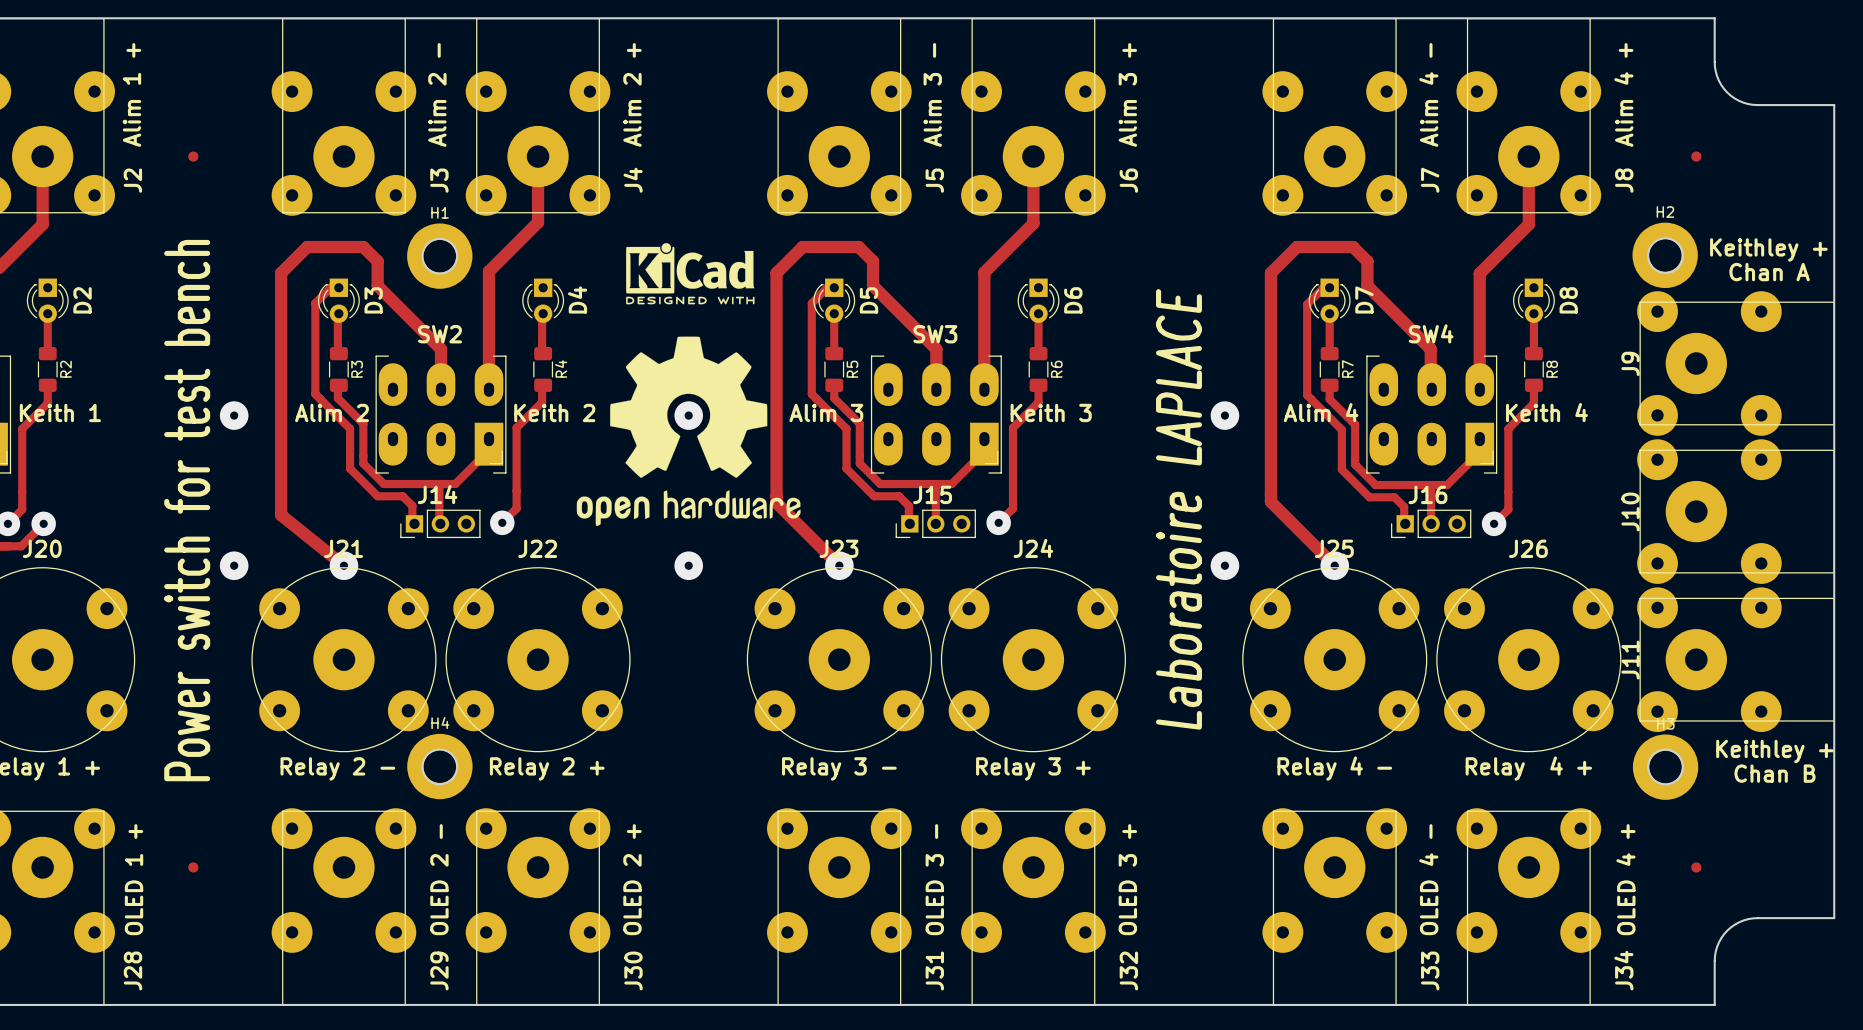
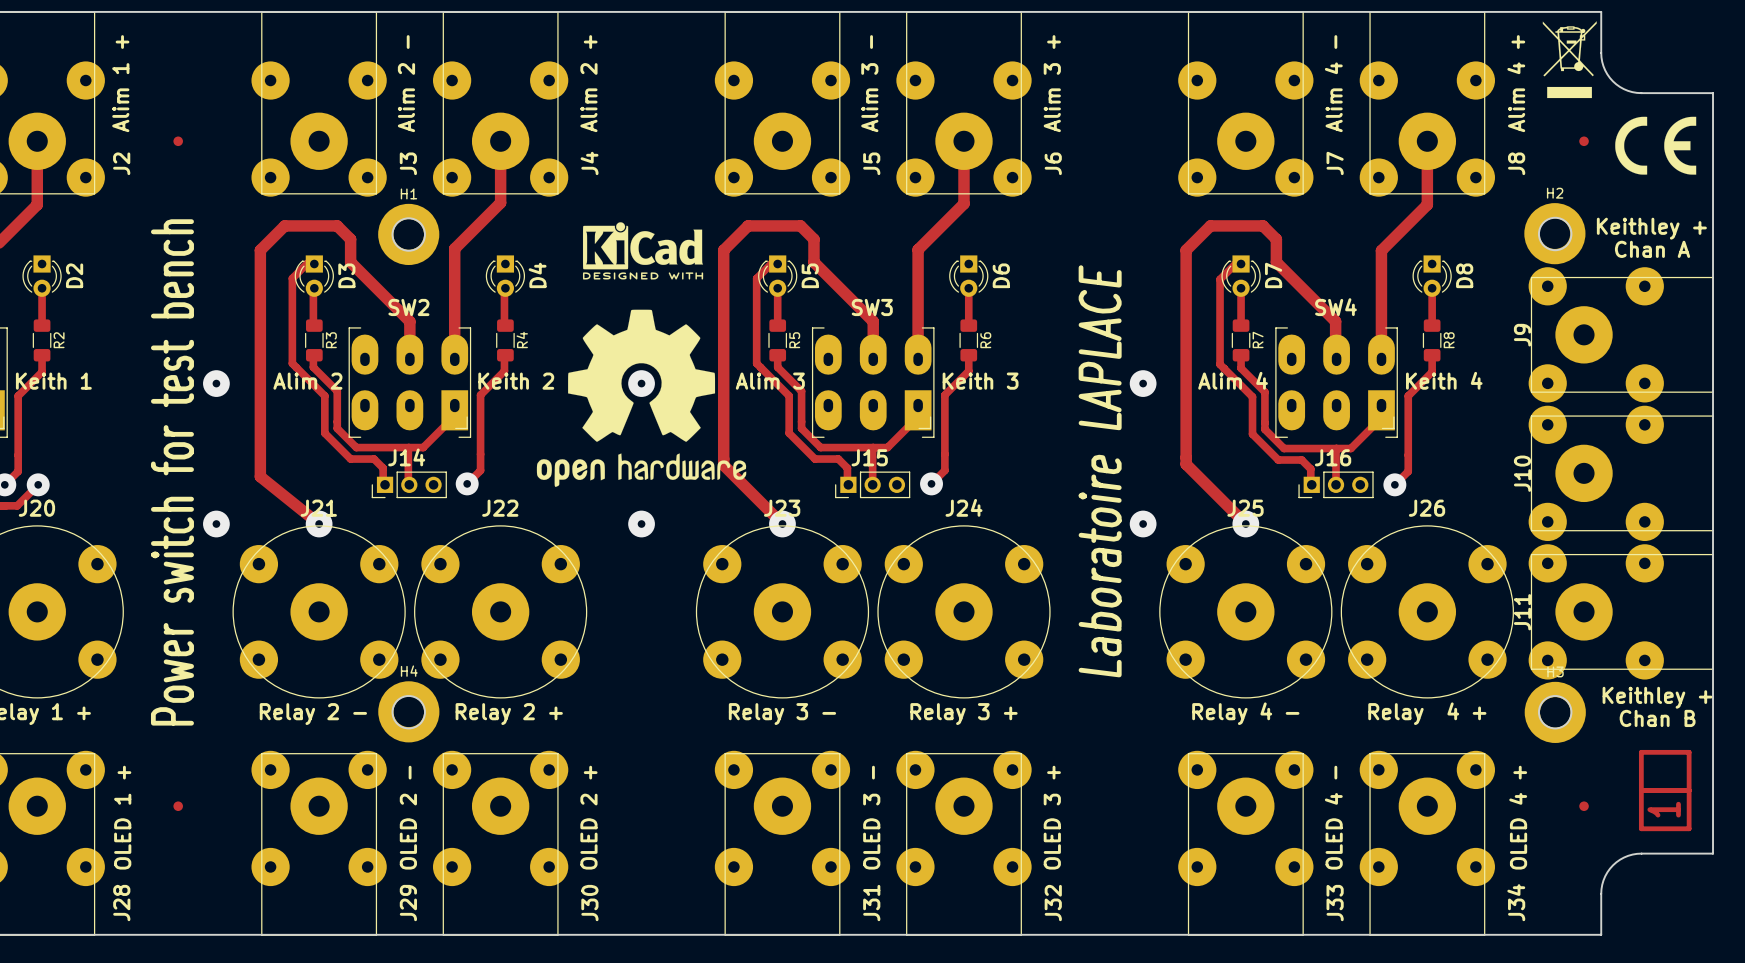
drawing: none -> [1542, 21, 1597, 99]
drawing: none -> [1615, 116, 1697, 175]
drawing: none -> [1638, 749, 1692, 832]
text: none -> 1 (1664, 809)

